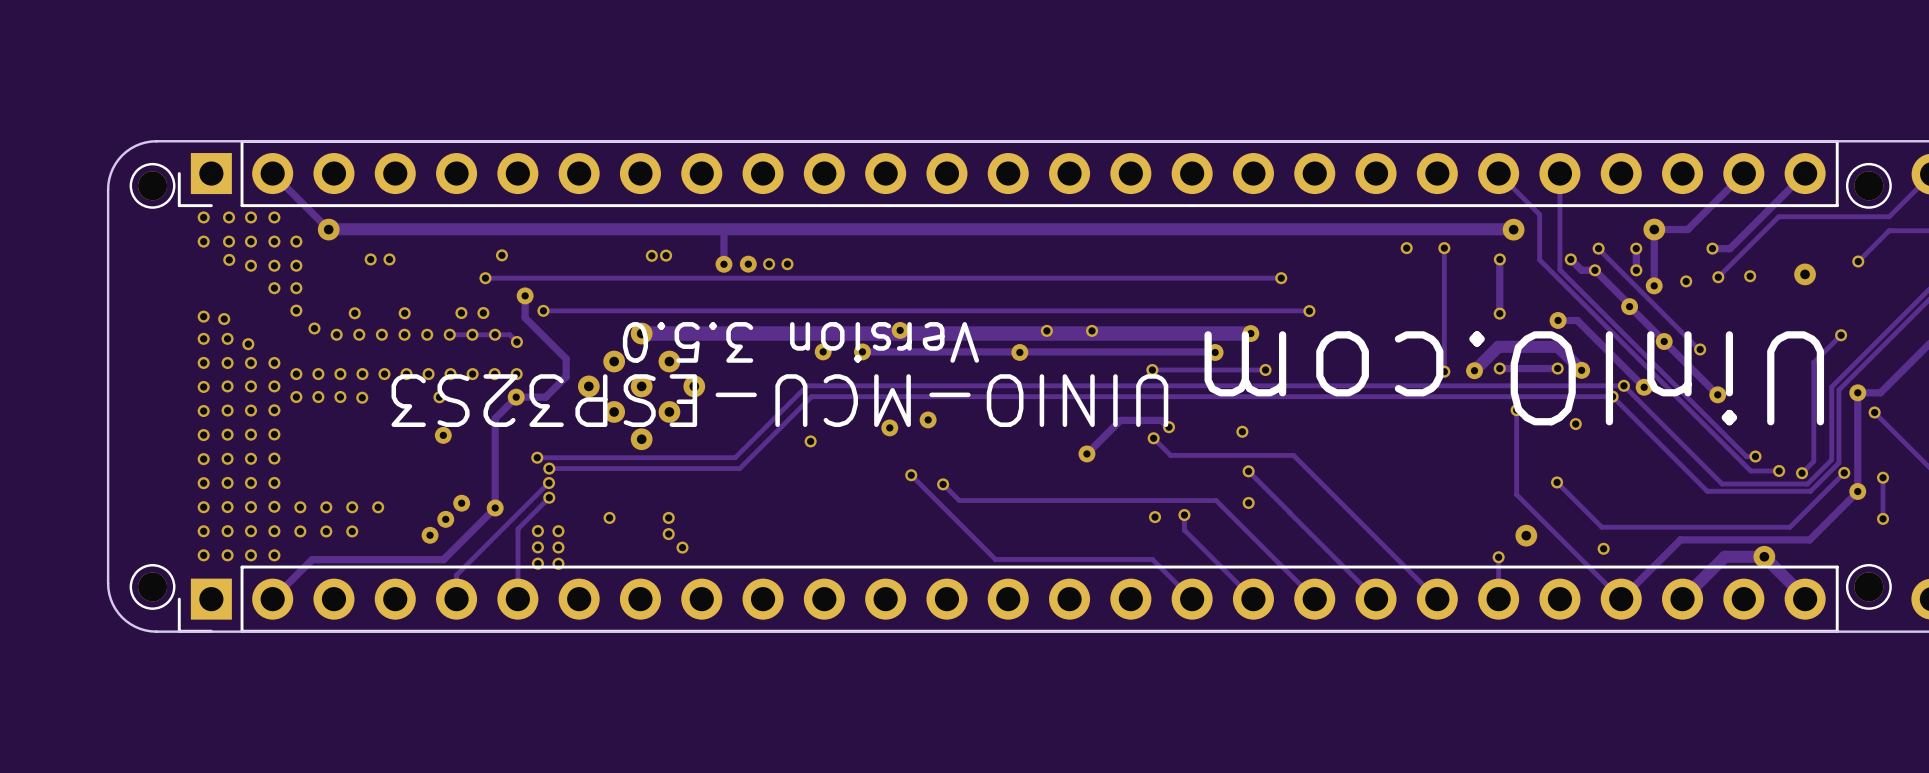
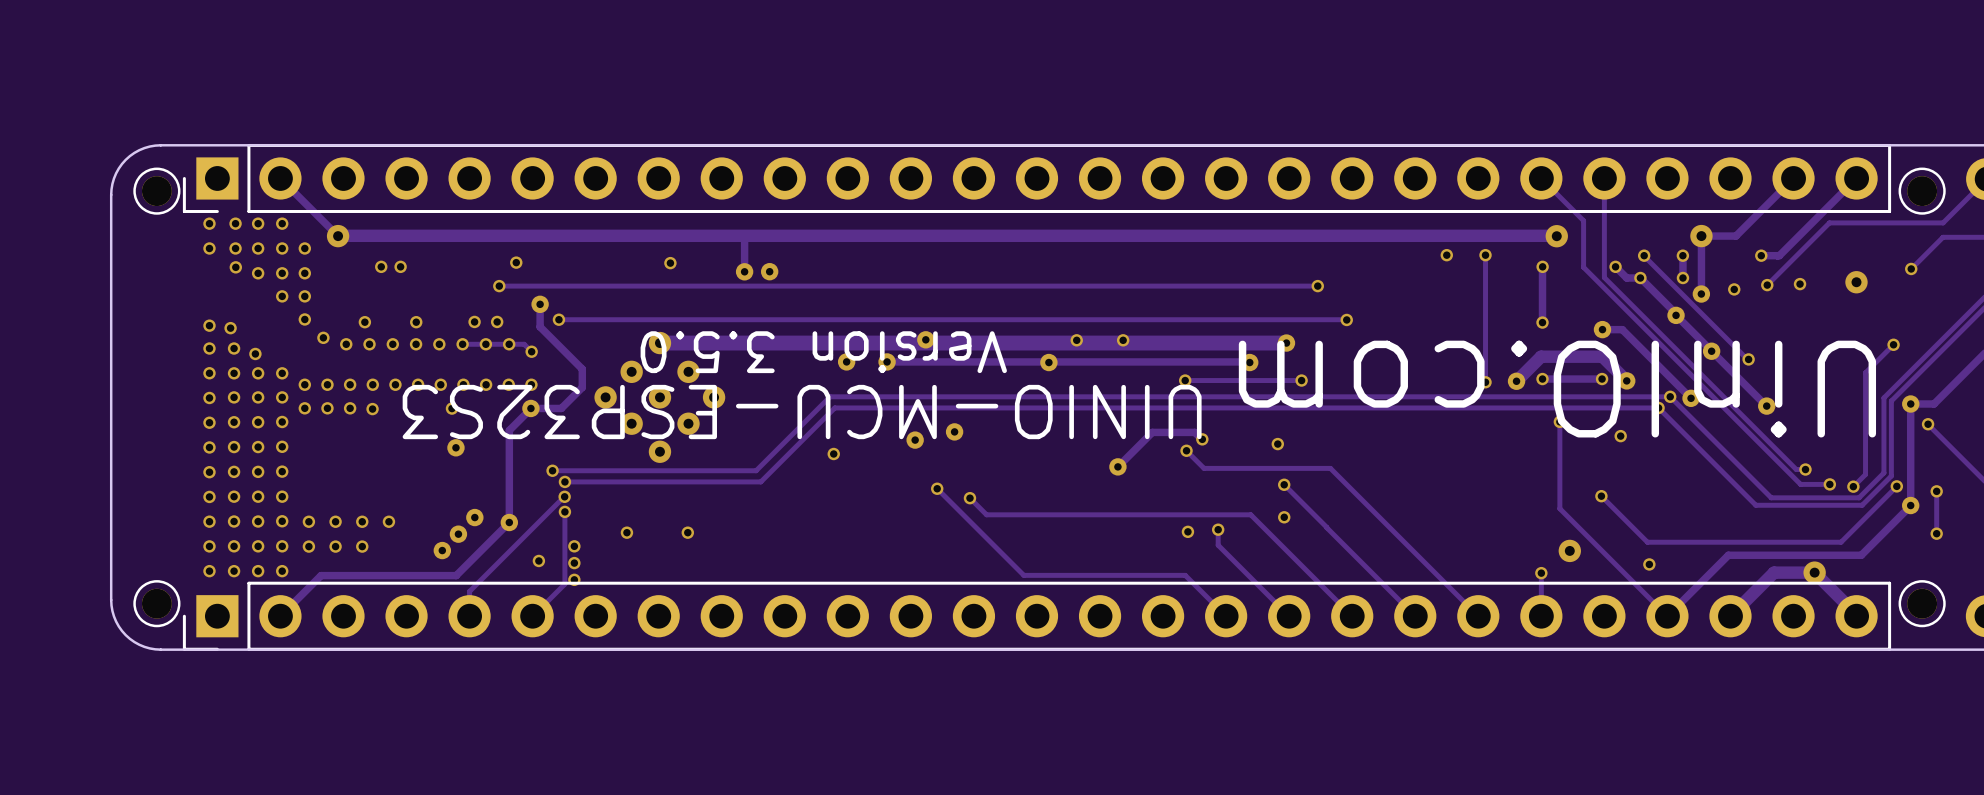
via: (666, 255) -> none
via: (769, 264) -> none
via: (787, 264) -> none
track: (549, 497) (518, 528) (518, 599) -> (564, 511) (564, 584) (532, 616)
via: (537, 531) -> none
via: (668, 534) -> none
via: none -> (538, 560)
via: (537, 547) -> none
via: (682, 547) -> none
via: (537, 563) -> none

